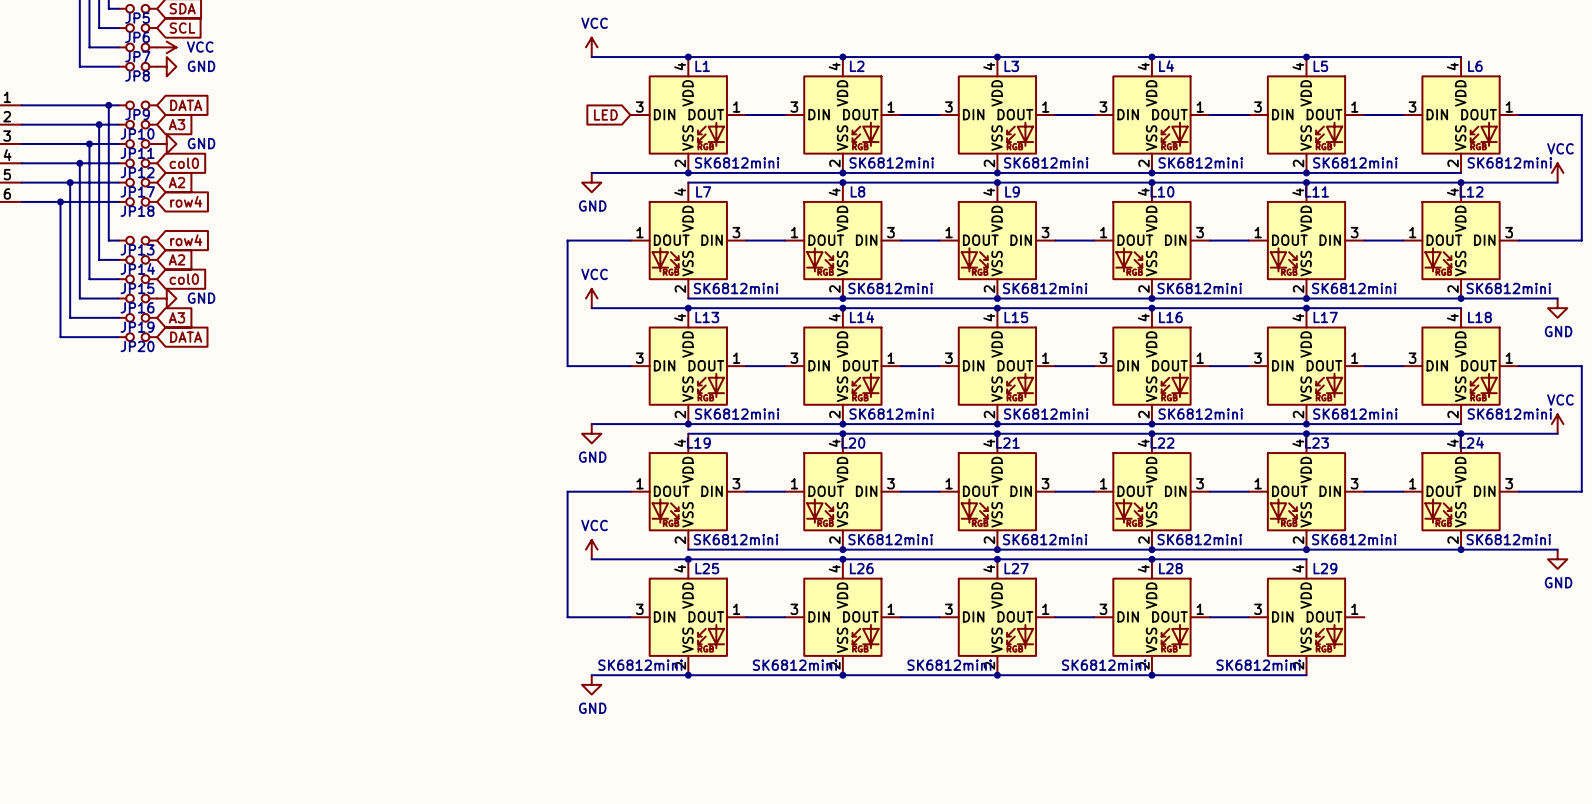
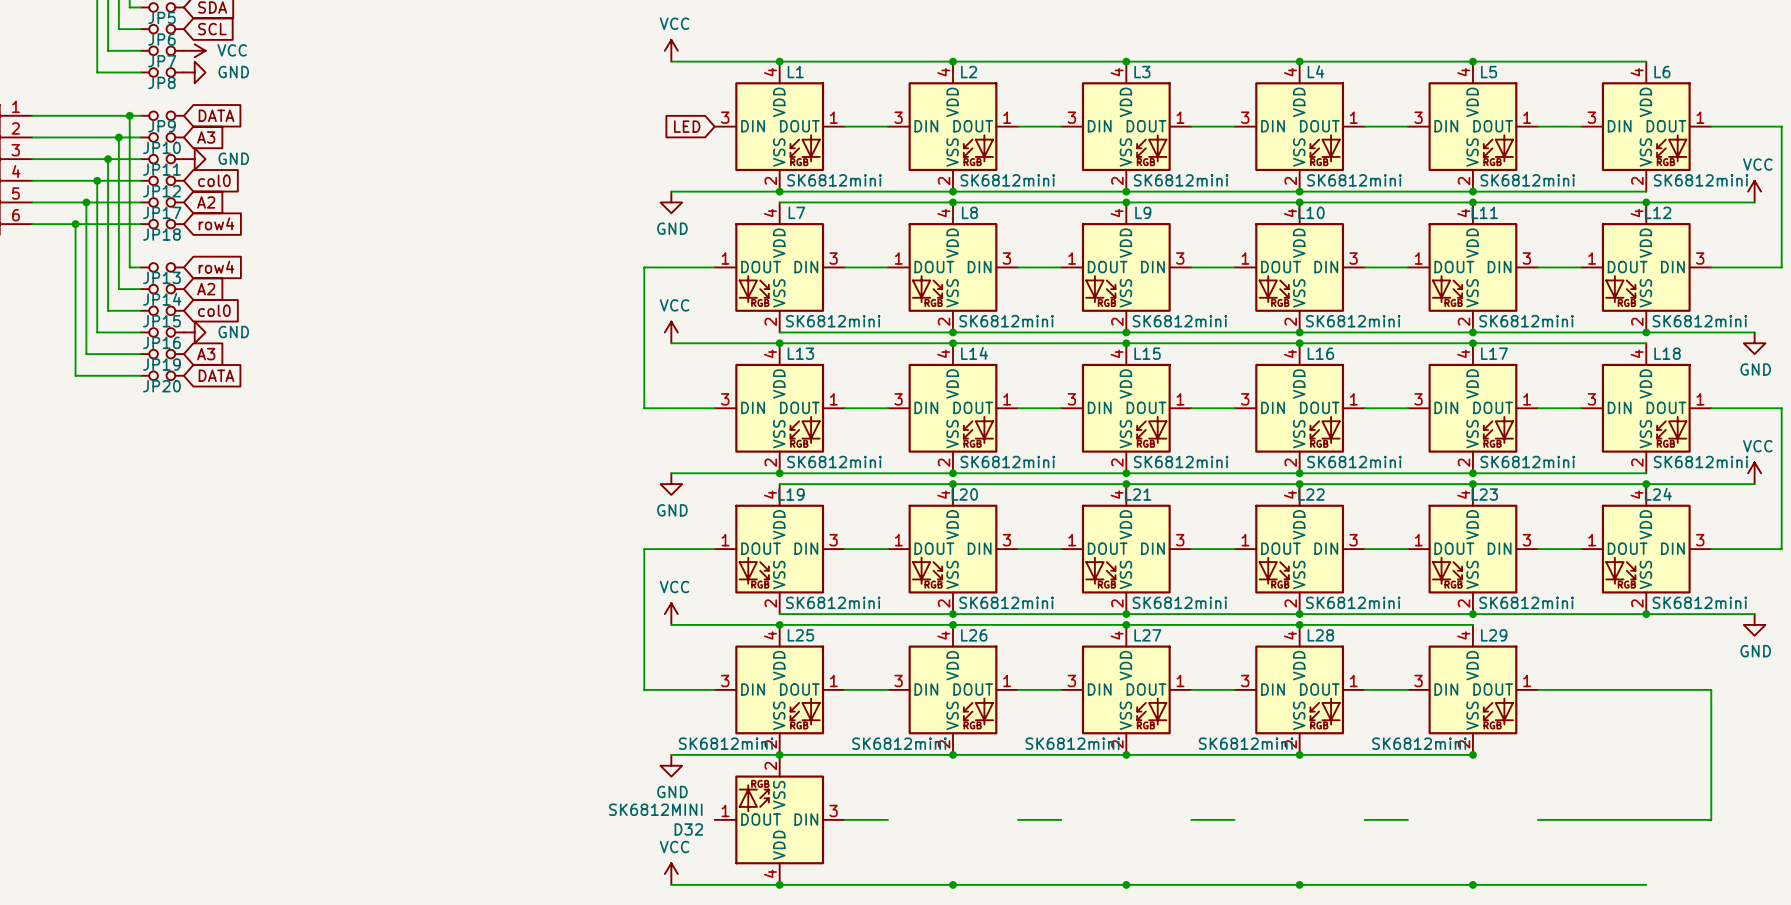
wire: none -> (1537, 689) (1711, 689) (1711, 819) (1537, 819)
junction: none -> (1472, 754)
D32: none -> SK6812MINI (779, 819)
wire: none -> (844, 819) (888, 819)
wire: none -> (1017, 819) (1061, 819)
wire: none -> (1191, 819) (1234, 819)
wire: none -> (1364, 819) (1407, 819)
power symbol: none -> VCC (671, 874)
wire: none -> (671, 884) (1646, 884)
junction: none -> (779, 884)
junction: none -> (952, 884)
junction: none -> (1126, 884)
junction: none -> (1299, 884)
junction: none -> (1472, 884)

